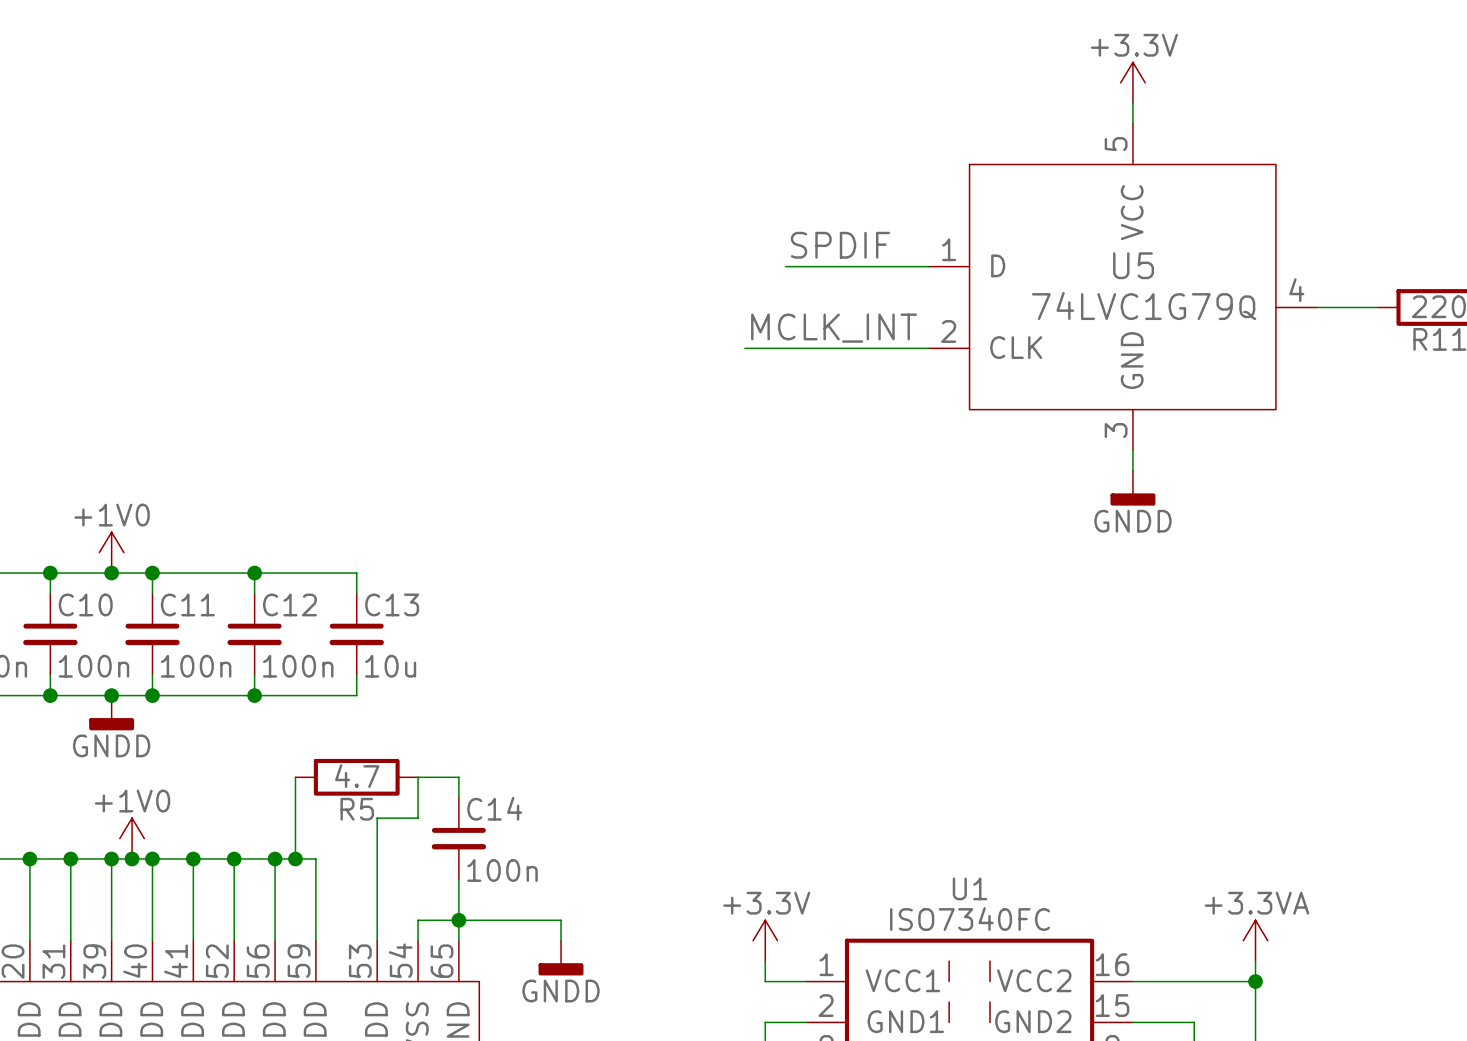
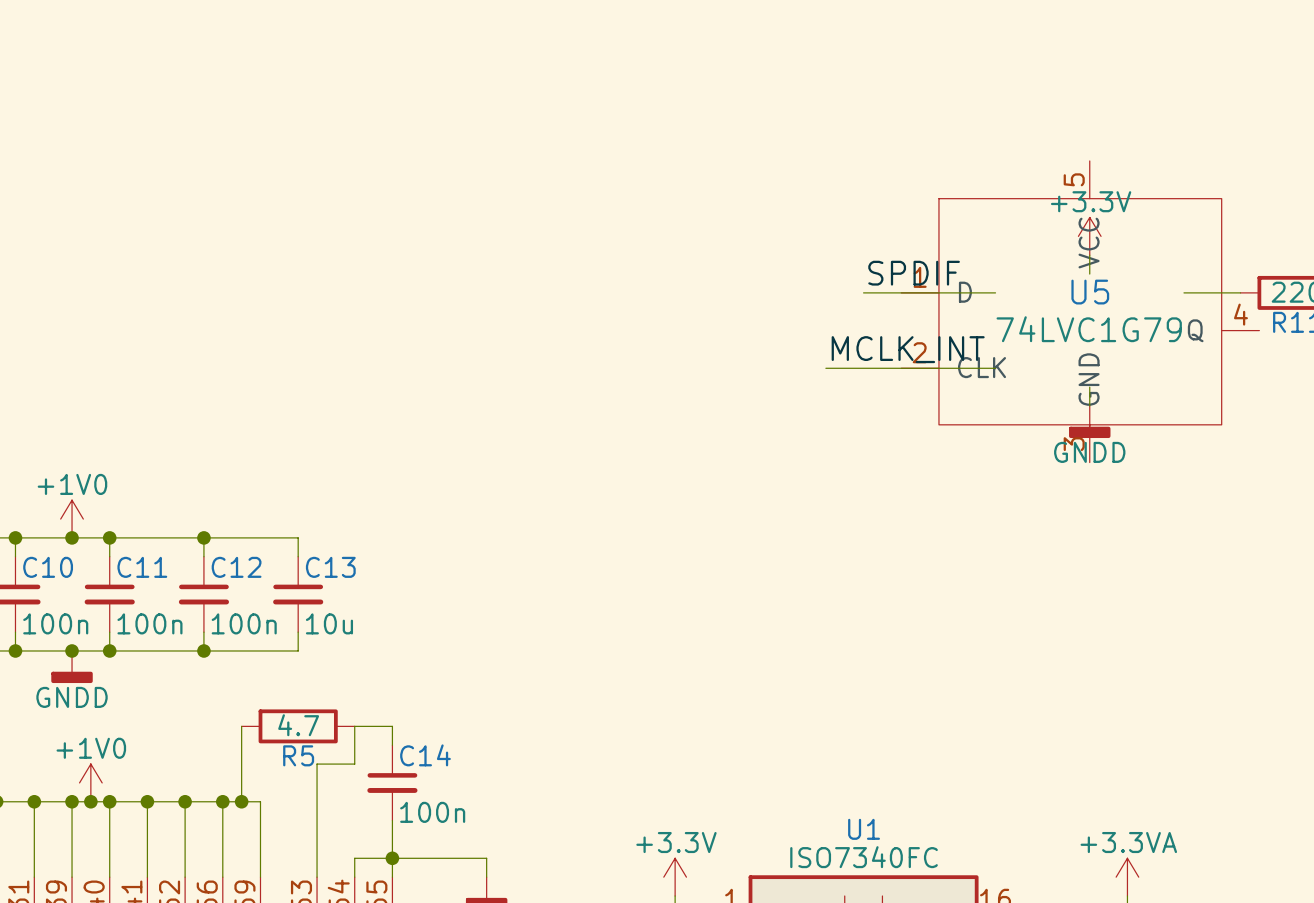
power symbol position: +3.3V (1132, 82) -> +3.3V (1089, 236)
wire: (1132, 103) (1132, 123) -> (1089, 255) (1089, 274)
label position: SPDIF (840, 245) -> SPDIF (914, 273)
wire: (785, 266) (928, 266) -> (863, 292) (995, 292)
U5 position: (1122, 287) -> (1080, 311)
label position: MCLK_INT (834, 328) -> MCLK_INT (908, 349)
wire: (744, 348) (928, 348) -> (825, 368) (995, 368)
wire: (1132, 450) (1132, 470) -> (1089, 387) (1089, 405)
power symbol position: GNDD (1132, 488) -> GNDD (1089, 422)

